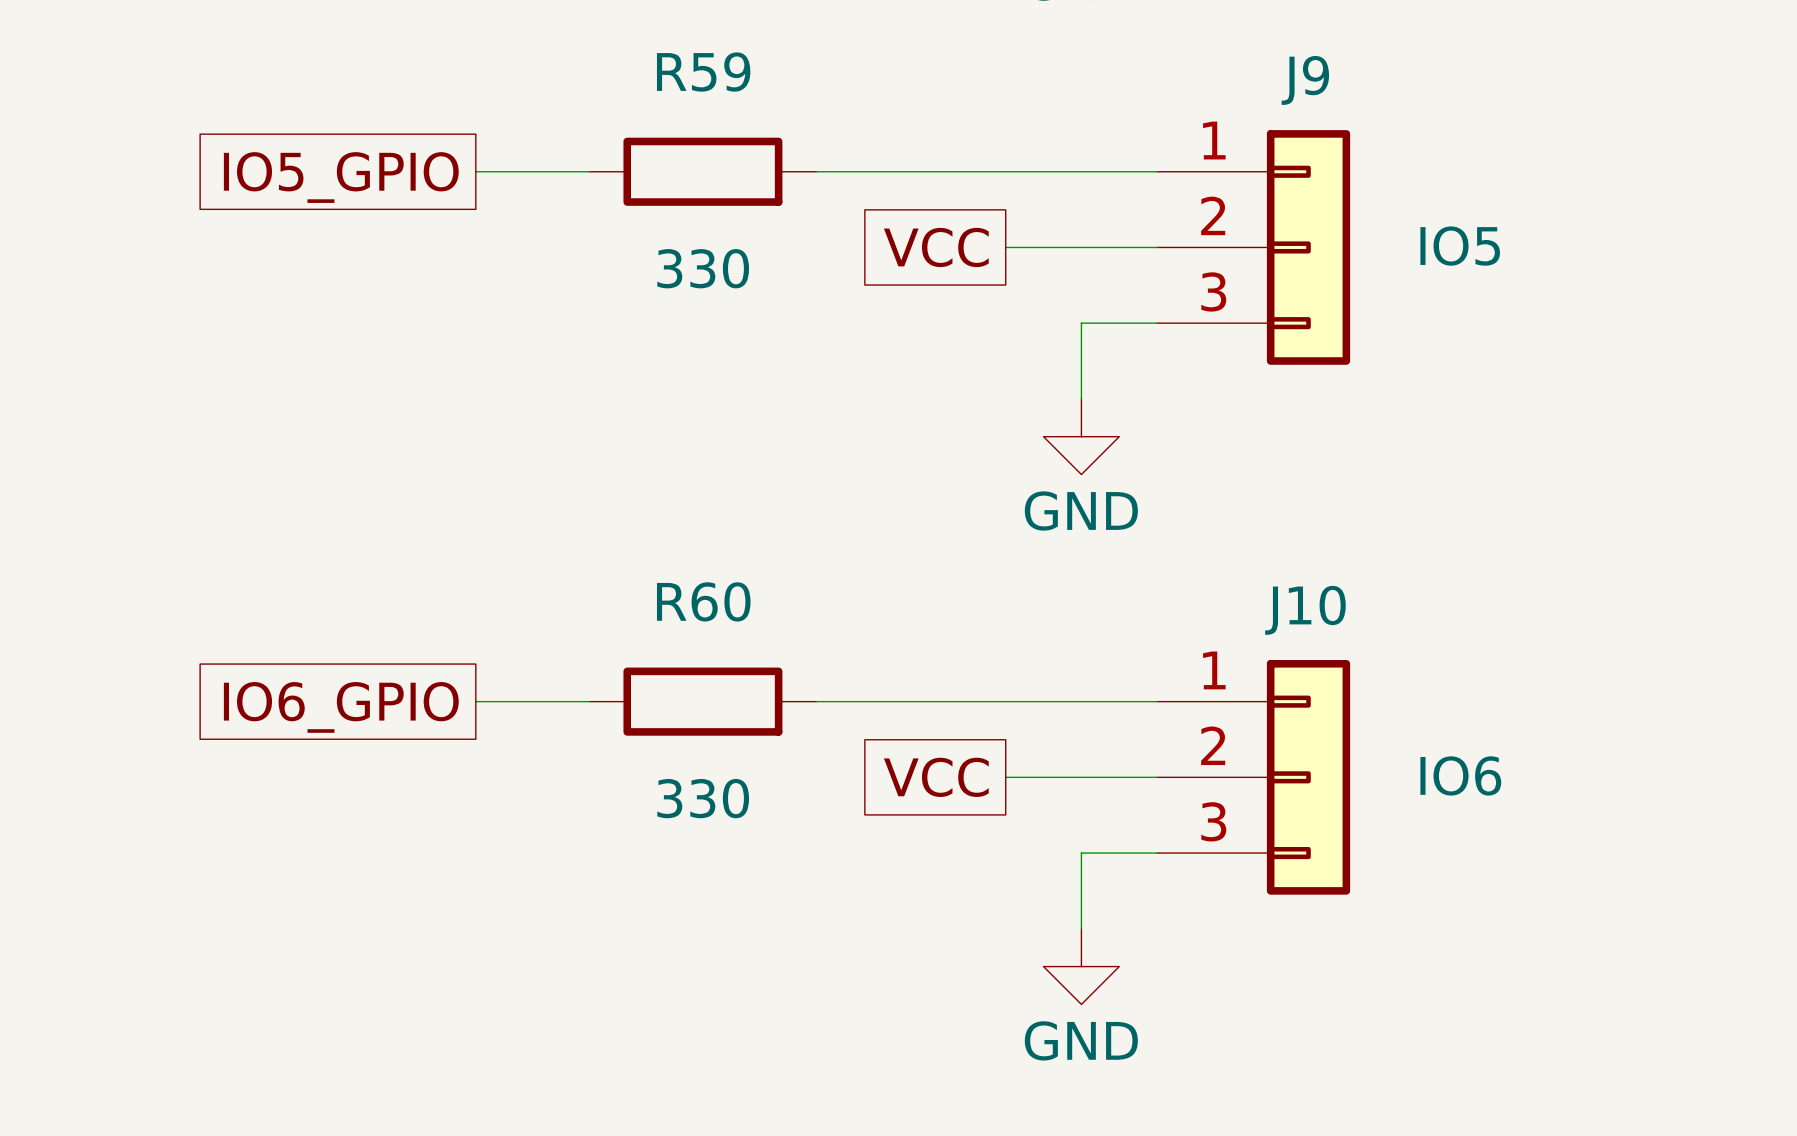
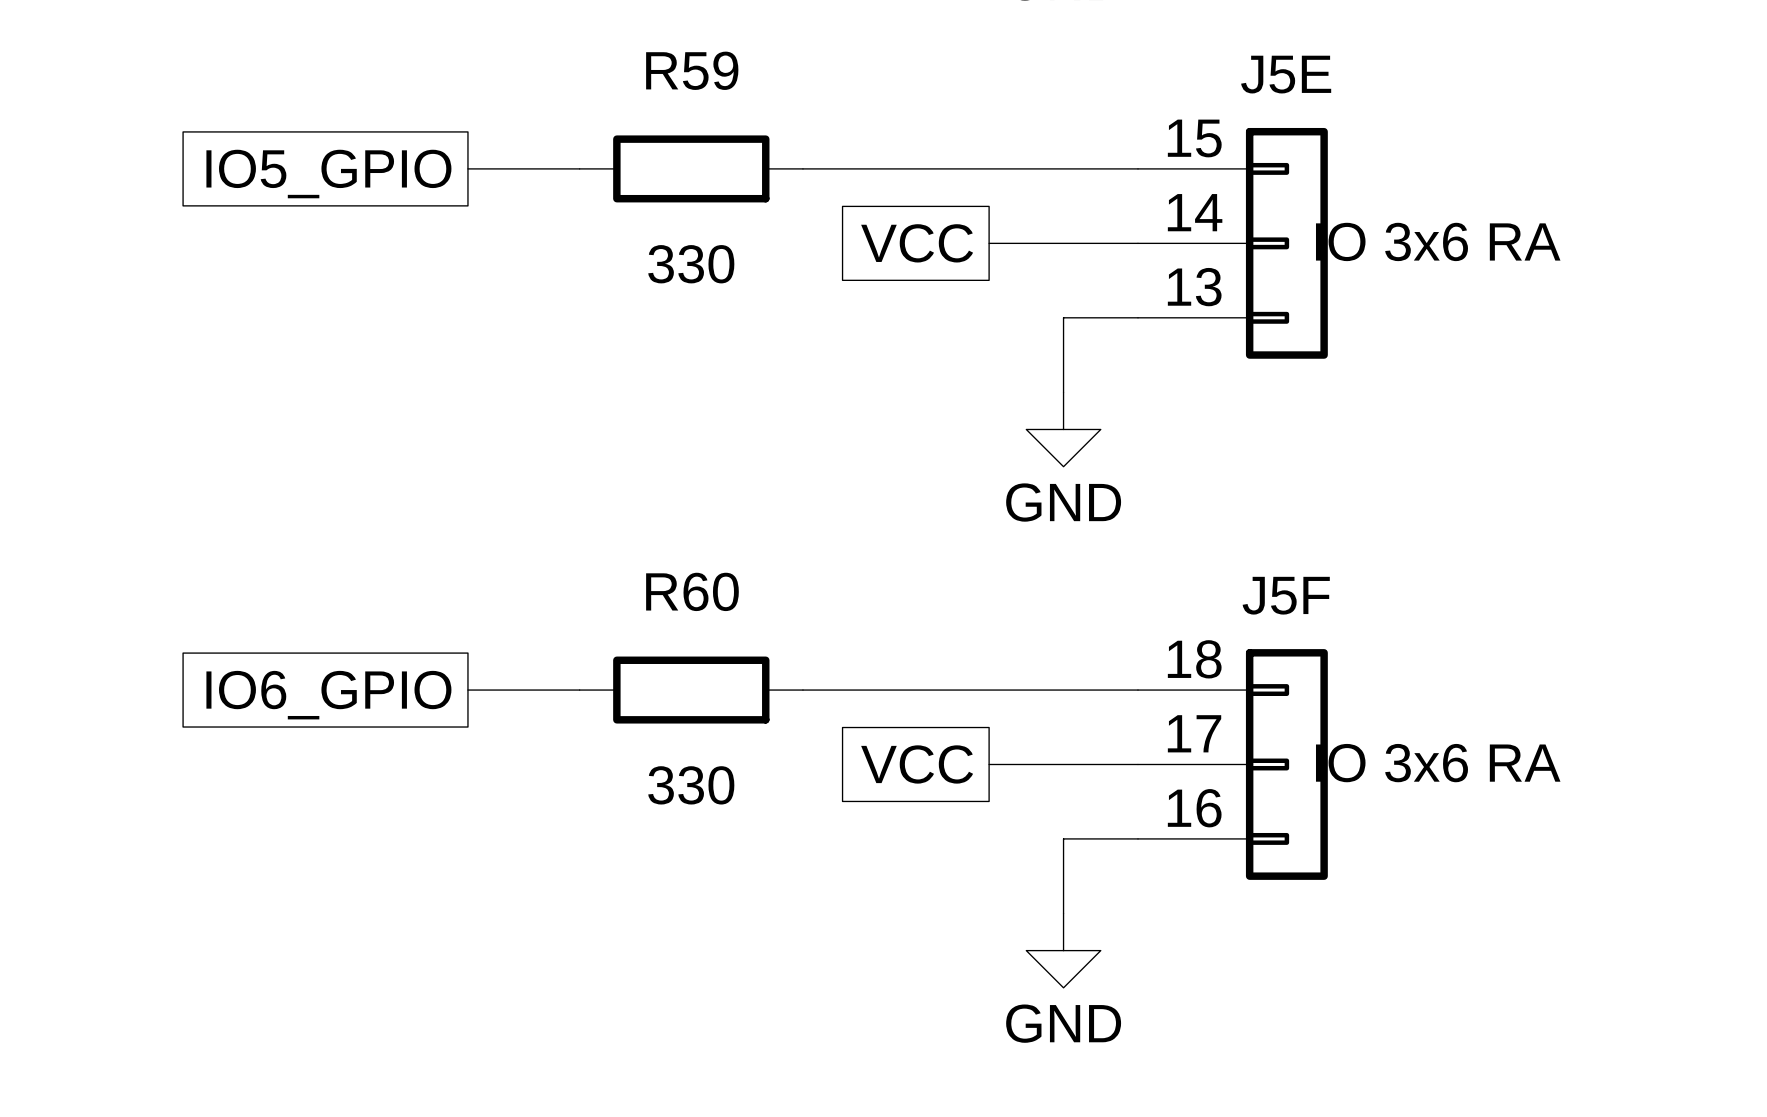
J9 name: J9 (1305, 80) -> J5E (1286, 74)
J9 pin number: 1 (1214, 140) -> 15 (1194, 138)
J9 pin number: 2 (1213, 215) -> 14 (1195, 212)
J9 value: IO5 (1460, 246) -> IO 3x6 RA (1438, 241)
J9 pin number: 3 (1213, 291) -> 13 (1194, 287)
J10 name: J10 (1305, 610) -> J5F (1286, 595)
J10 pin number: 1 (1214, 670) -> 18 (1194, 659)
J10 pin number: 2 (1213, 745) -> 17 (1194, 733)
J10 value: IO6 (1460, 775) -> IO 3x6 RA (1438, 763)
J10 pin number: 3 (1213, 821) -> 16 (1194, 808)

